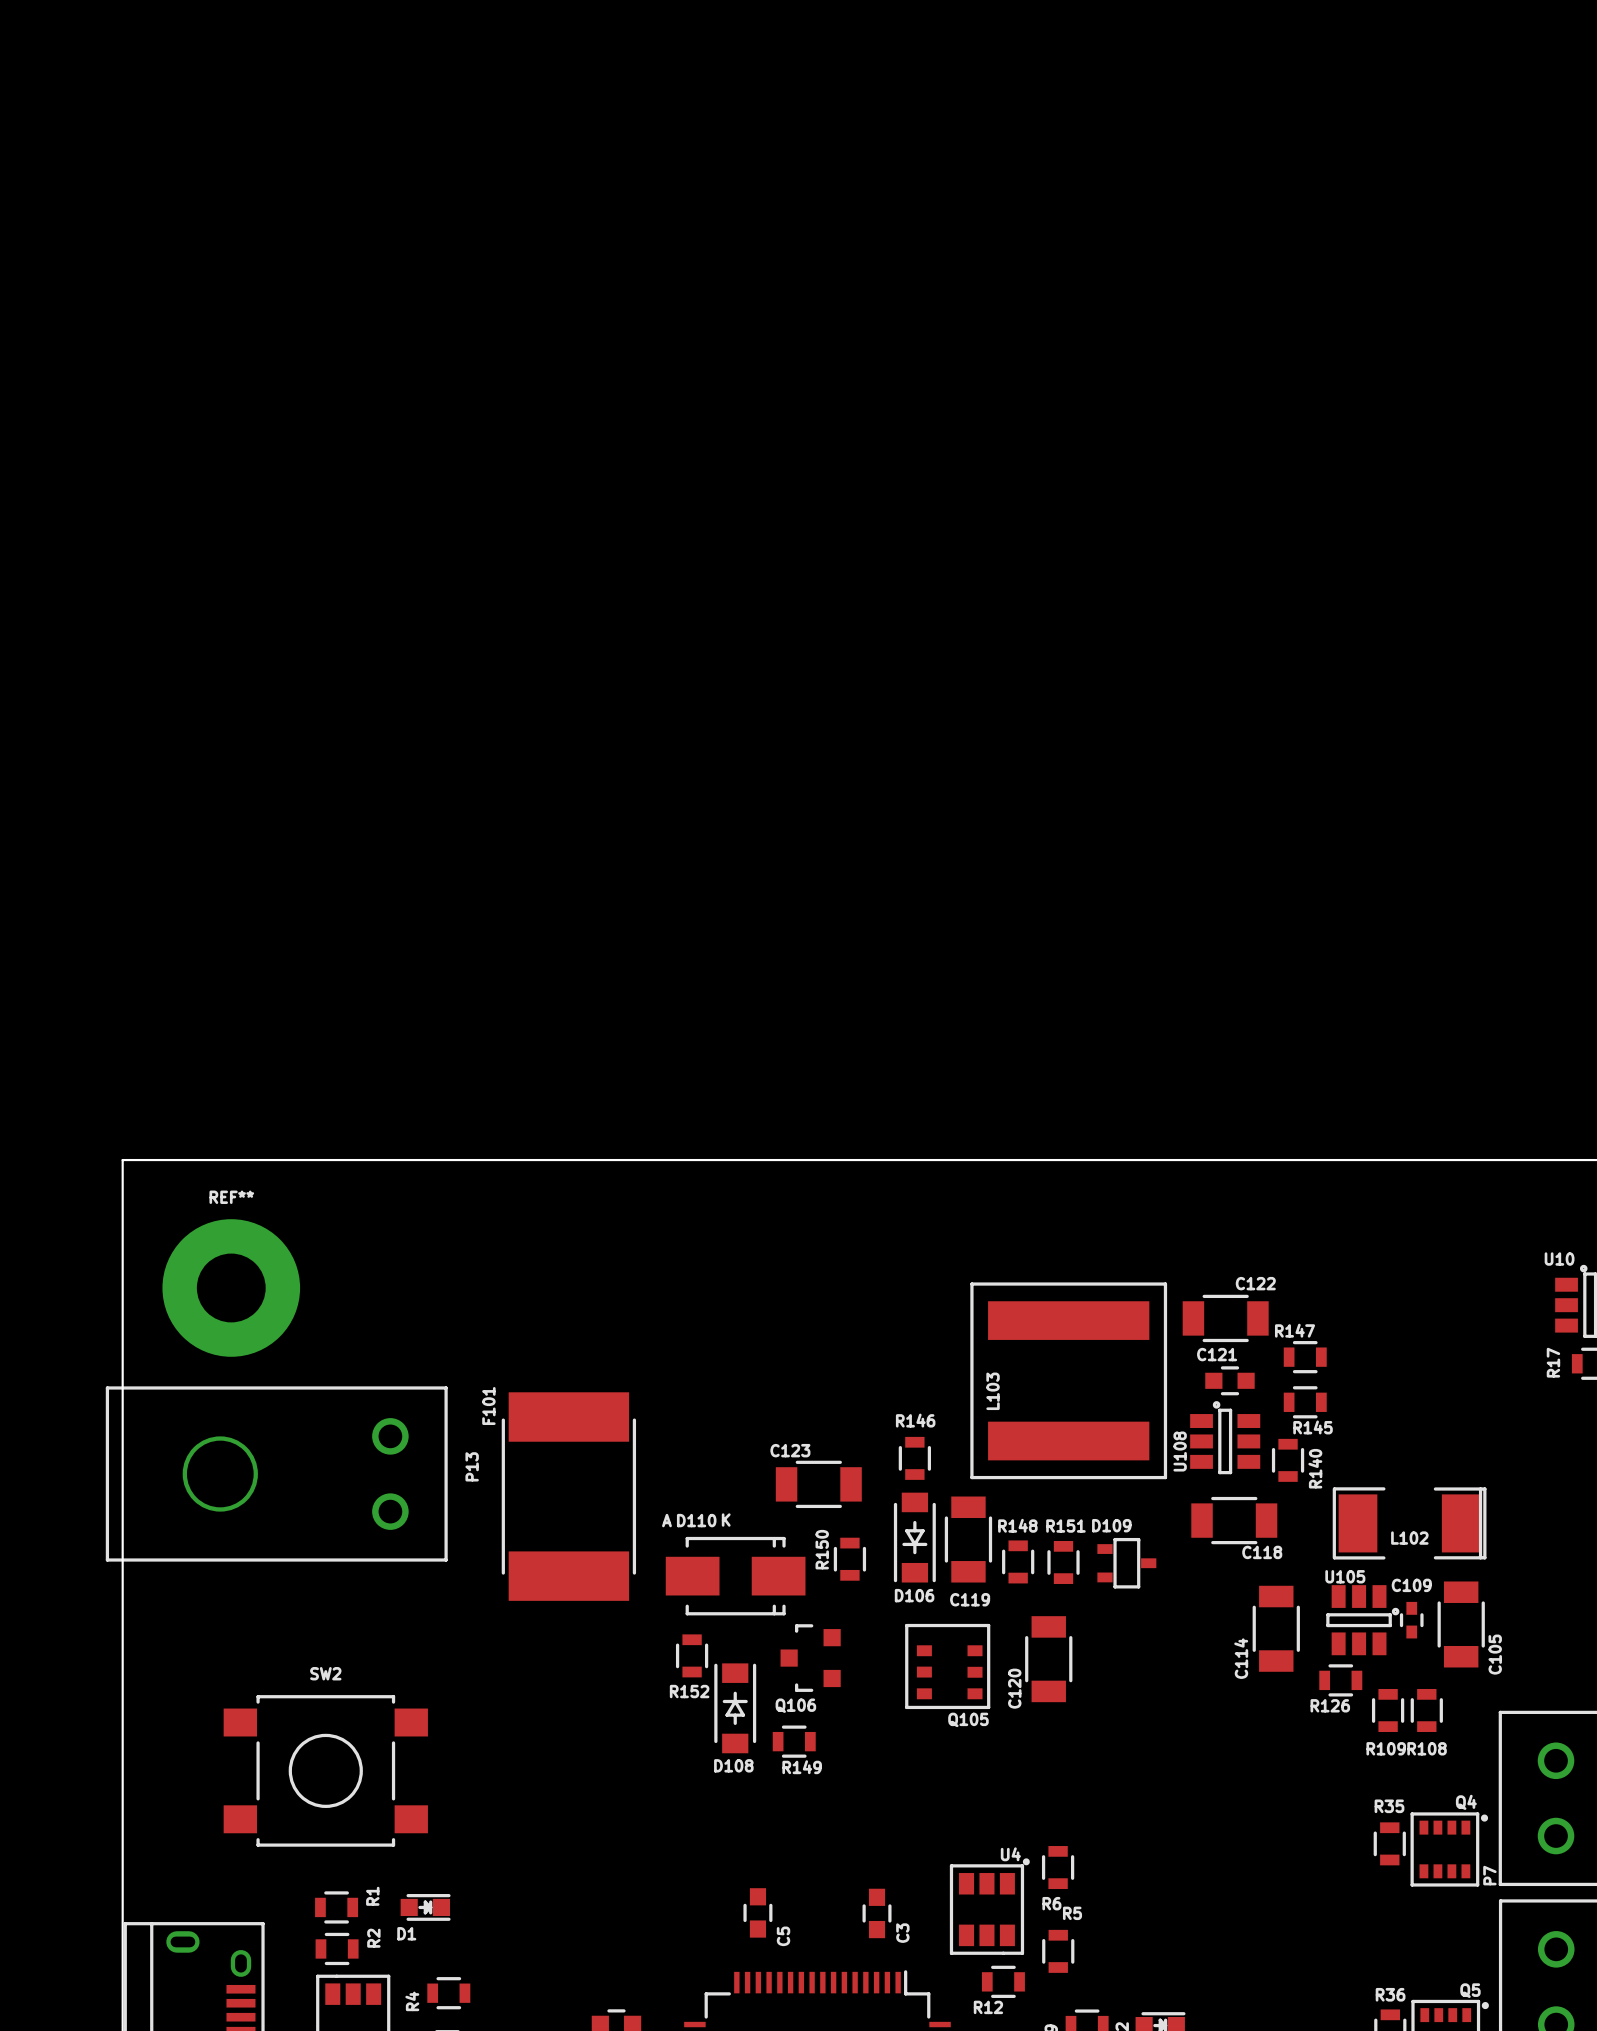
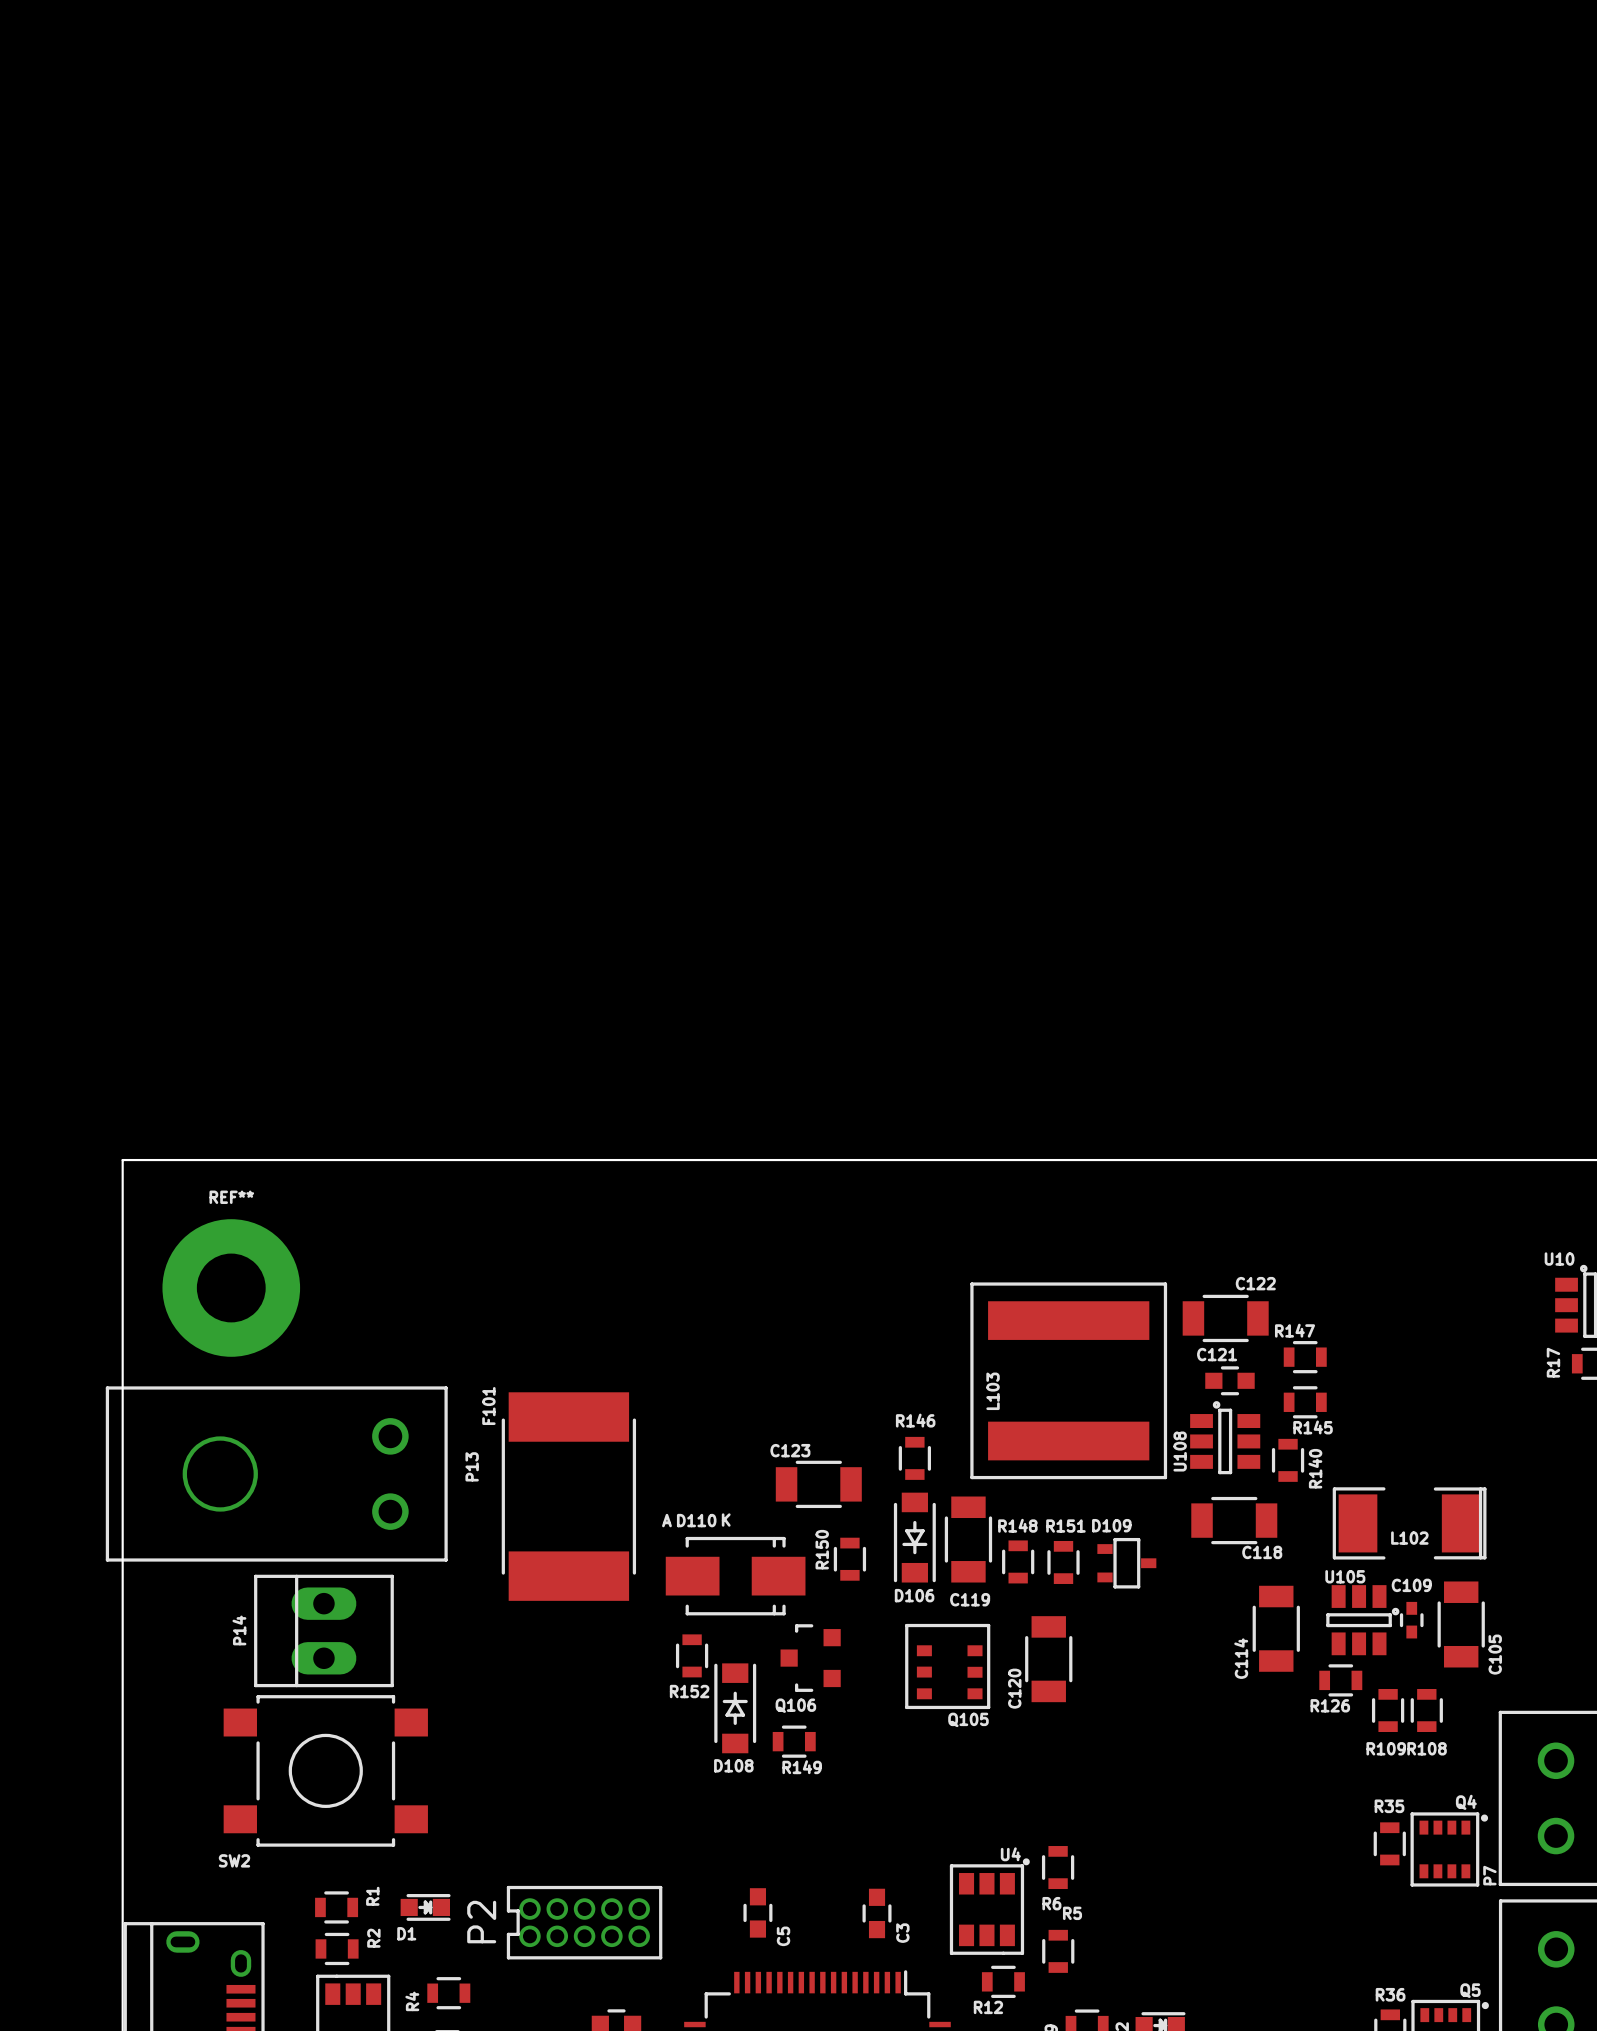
P14: none -> (323, 1630)
SW2 name position: SW2 (325, 1673) -> SW2 (234, 1860)
P2: none -> (584, 1922)

